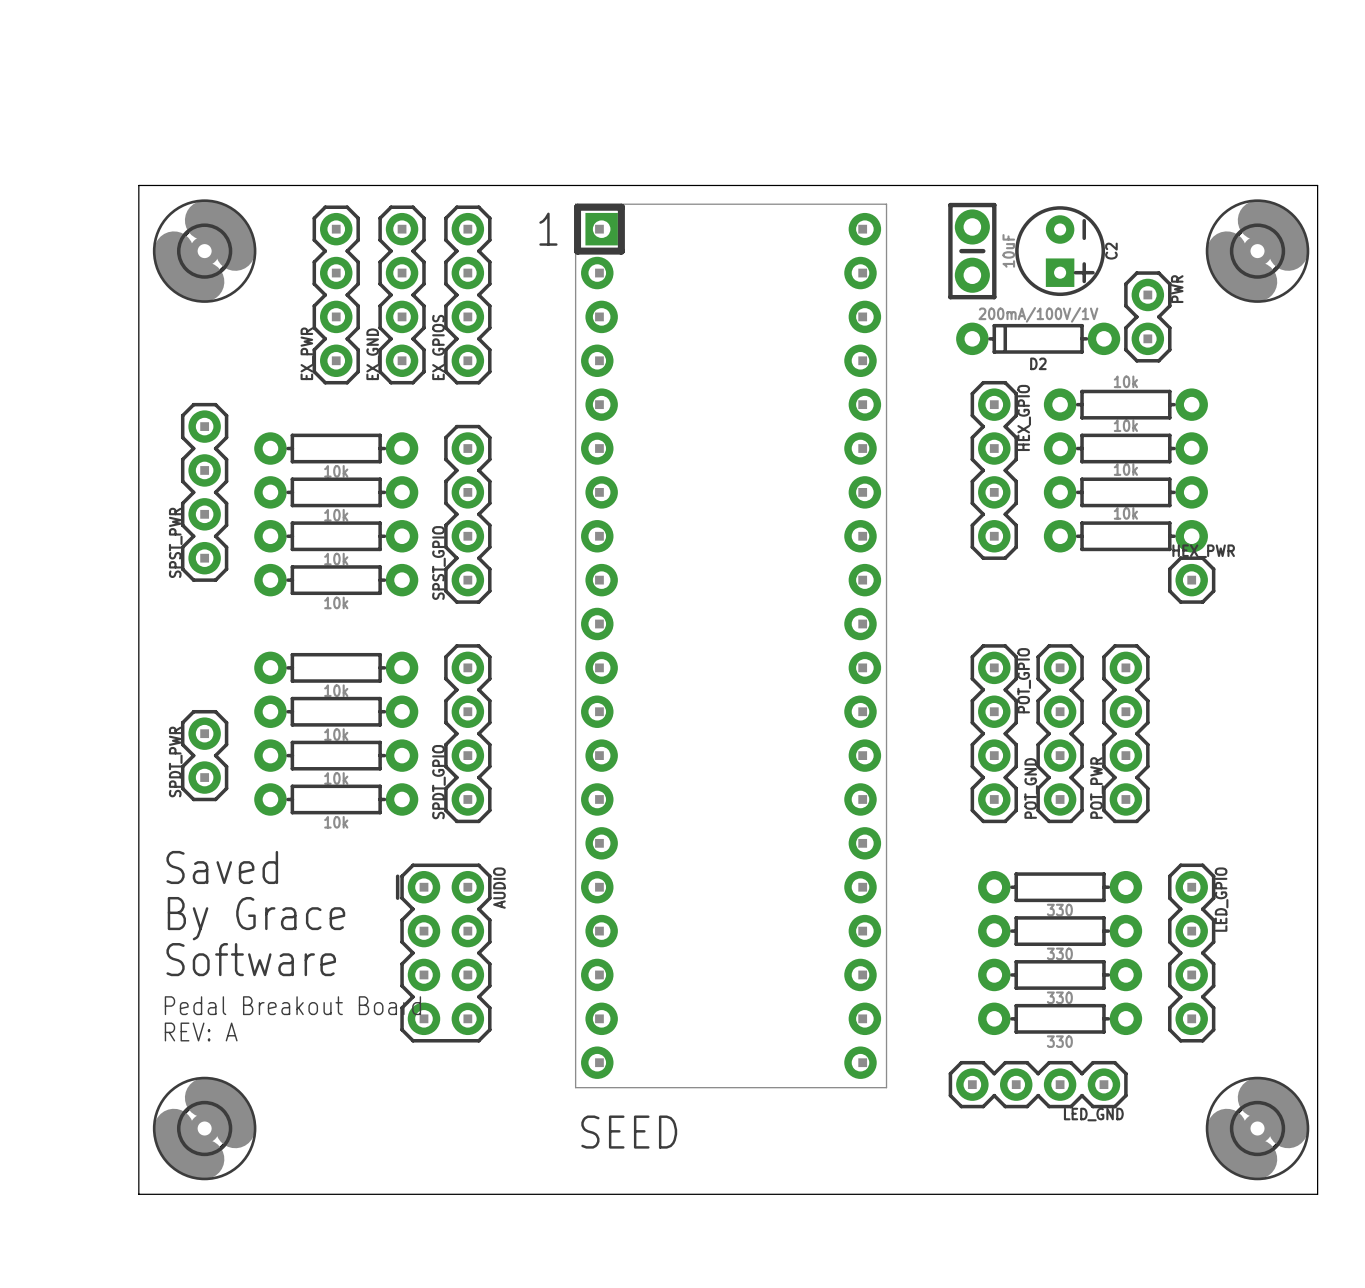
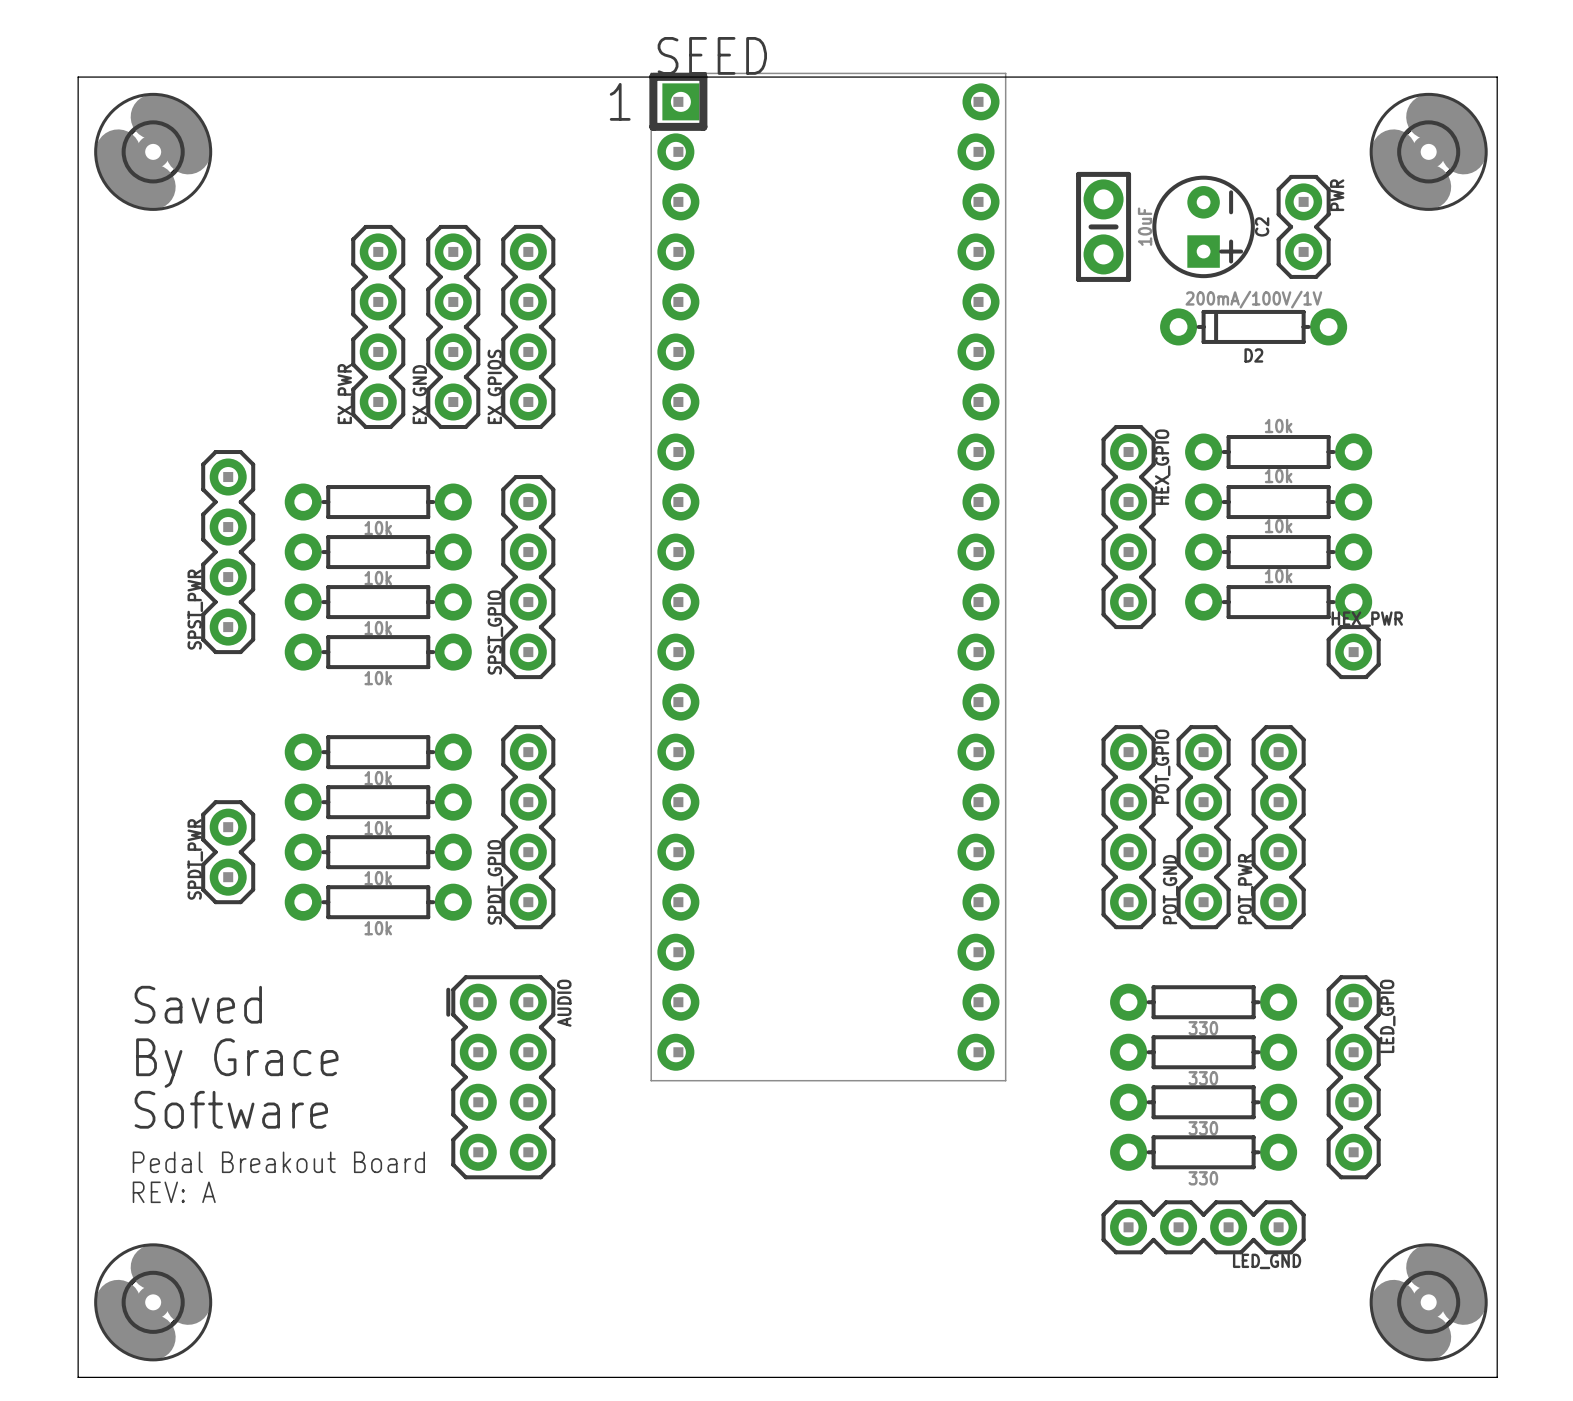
board edge: (1317, 185) (138, 185) (138, 1194) (1317, 1194) -> (1497, 202) (1497, 77) (78, 77) (78, 1377) (1497, 1377) (1497, 1352)
part position: (204, 251) -> (153, 151)
part position: (972, 251) -> (1103, 226)
C2 position: (1060, 251) -> (1203, 226)
part position: (1257, 251) -> (1428, 151)
PWR position: (1147, 316) -> (1303, 226)
D2 position: (1038, 338) -> (1253, 326)
SEED position: (730, 645) -> (827, 577)
text position: Saved (222, 867) -> Saved (198, 1004)
text position: By Grace (256, 918) -> By Grace (237, 1063)
text position: Software (251, 959) -> Software (231, 1109)
text position: Pedal Breakout Board (292, 1005) -> Pedal Breakout Board (278, 1162)
text position: REV: A (201, 1031) -> REV: A (174, 1192)
LED_GND position: (1038, 1084) -> (1203, 1227)
part position: (204, 1128) -> (153, 1302)
part position: (1257, 1128) -> (1428, 1302)
SEED name position: SEED (629, 1132) -> SEED (712, 55)

